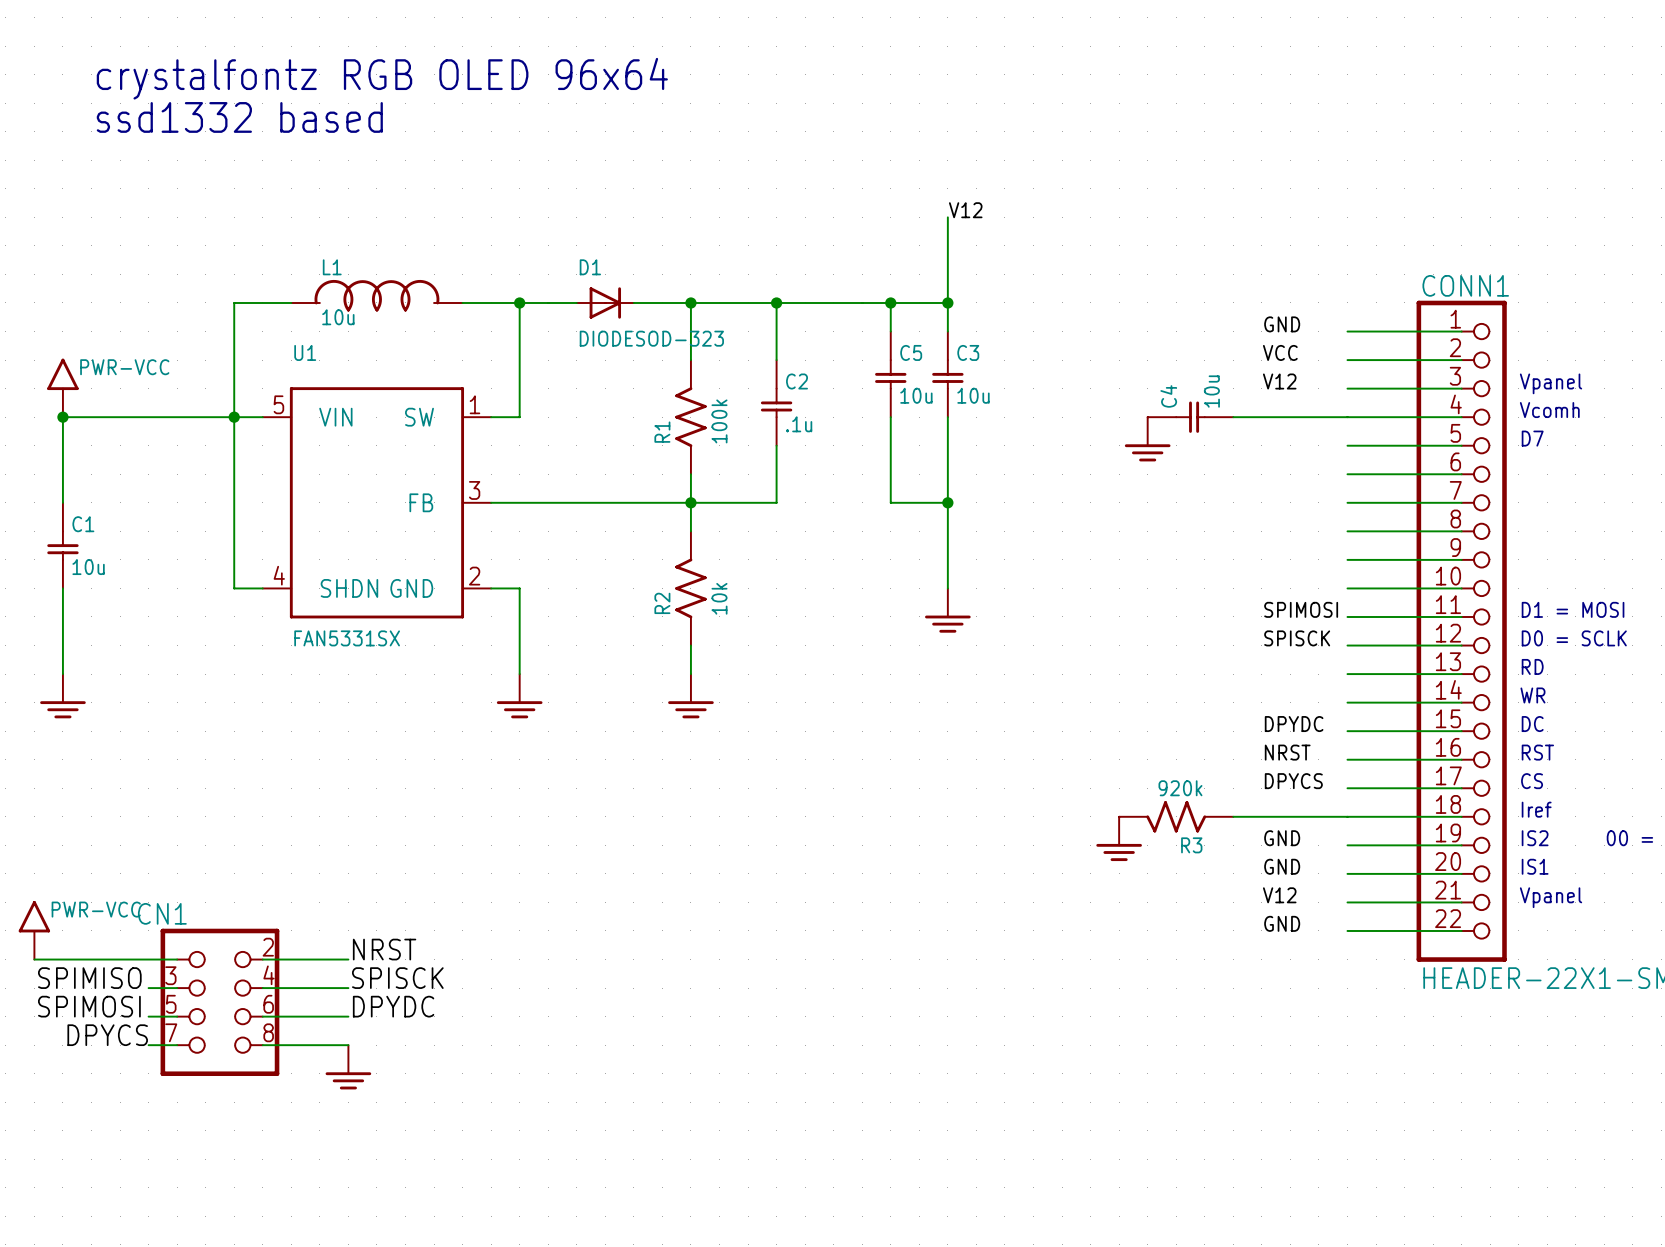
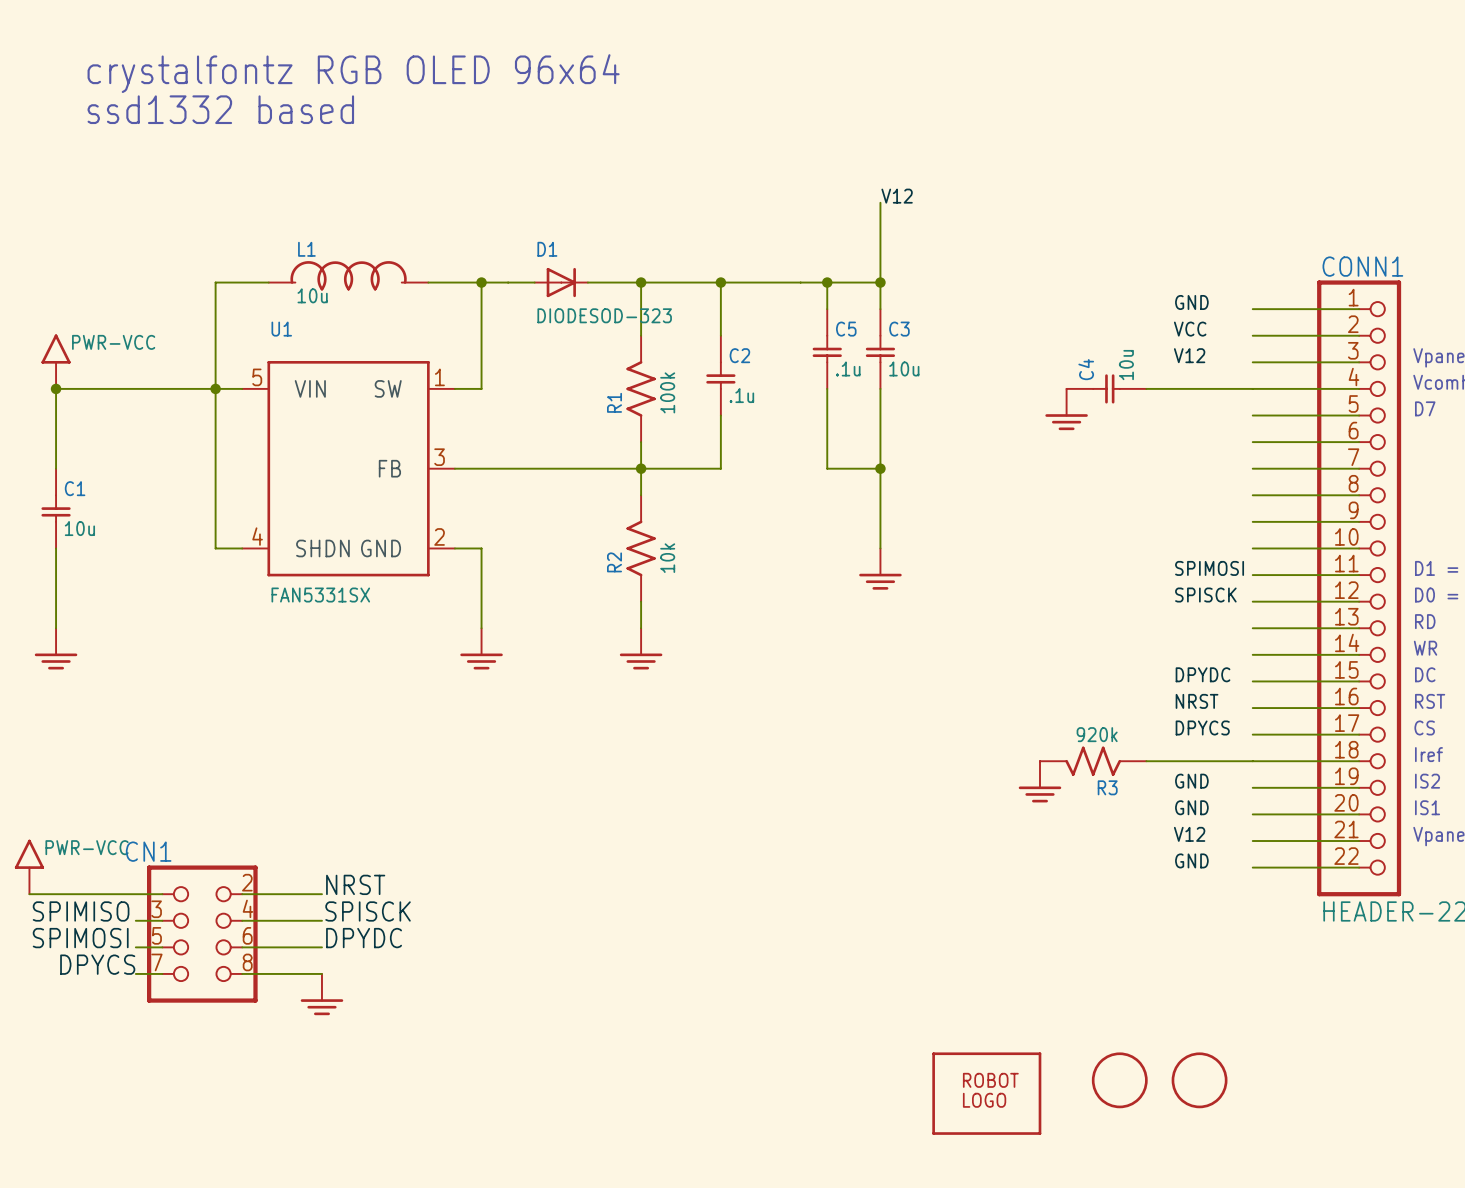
C5 value: 10u (916, 395) -> .1u (848, 368)
part: none -> (1119, 1080)
part: none -> (1199, 1080)
part: none -> (986, 1093)

